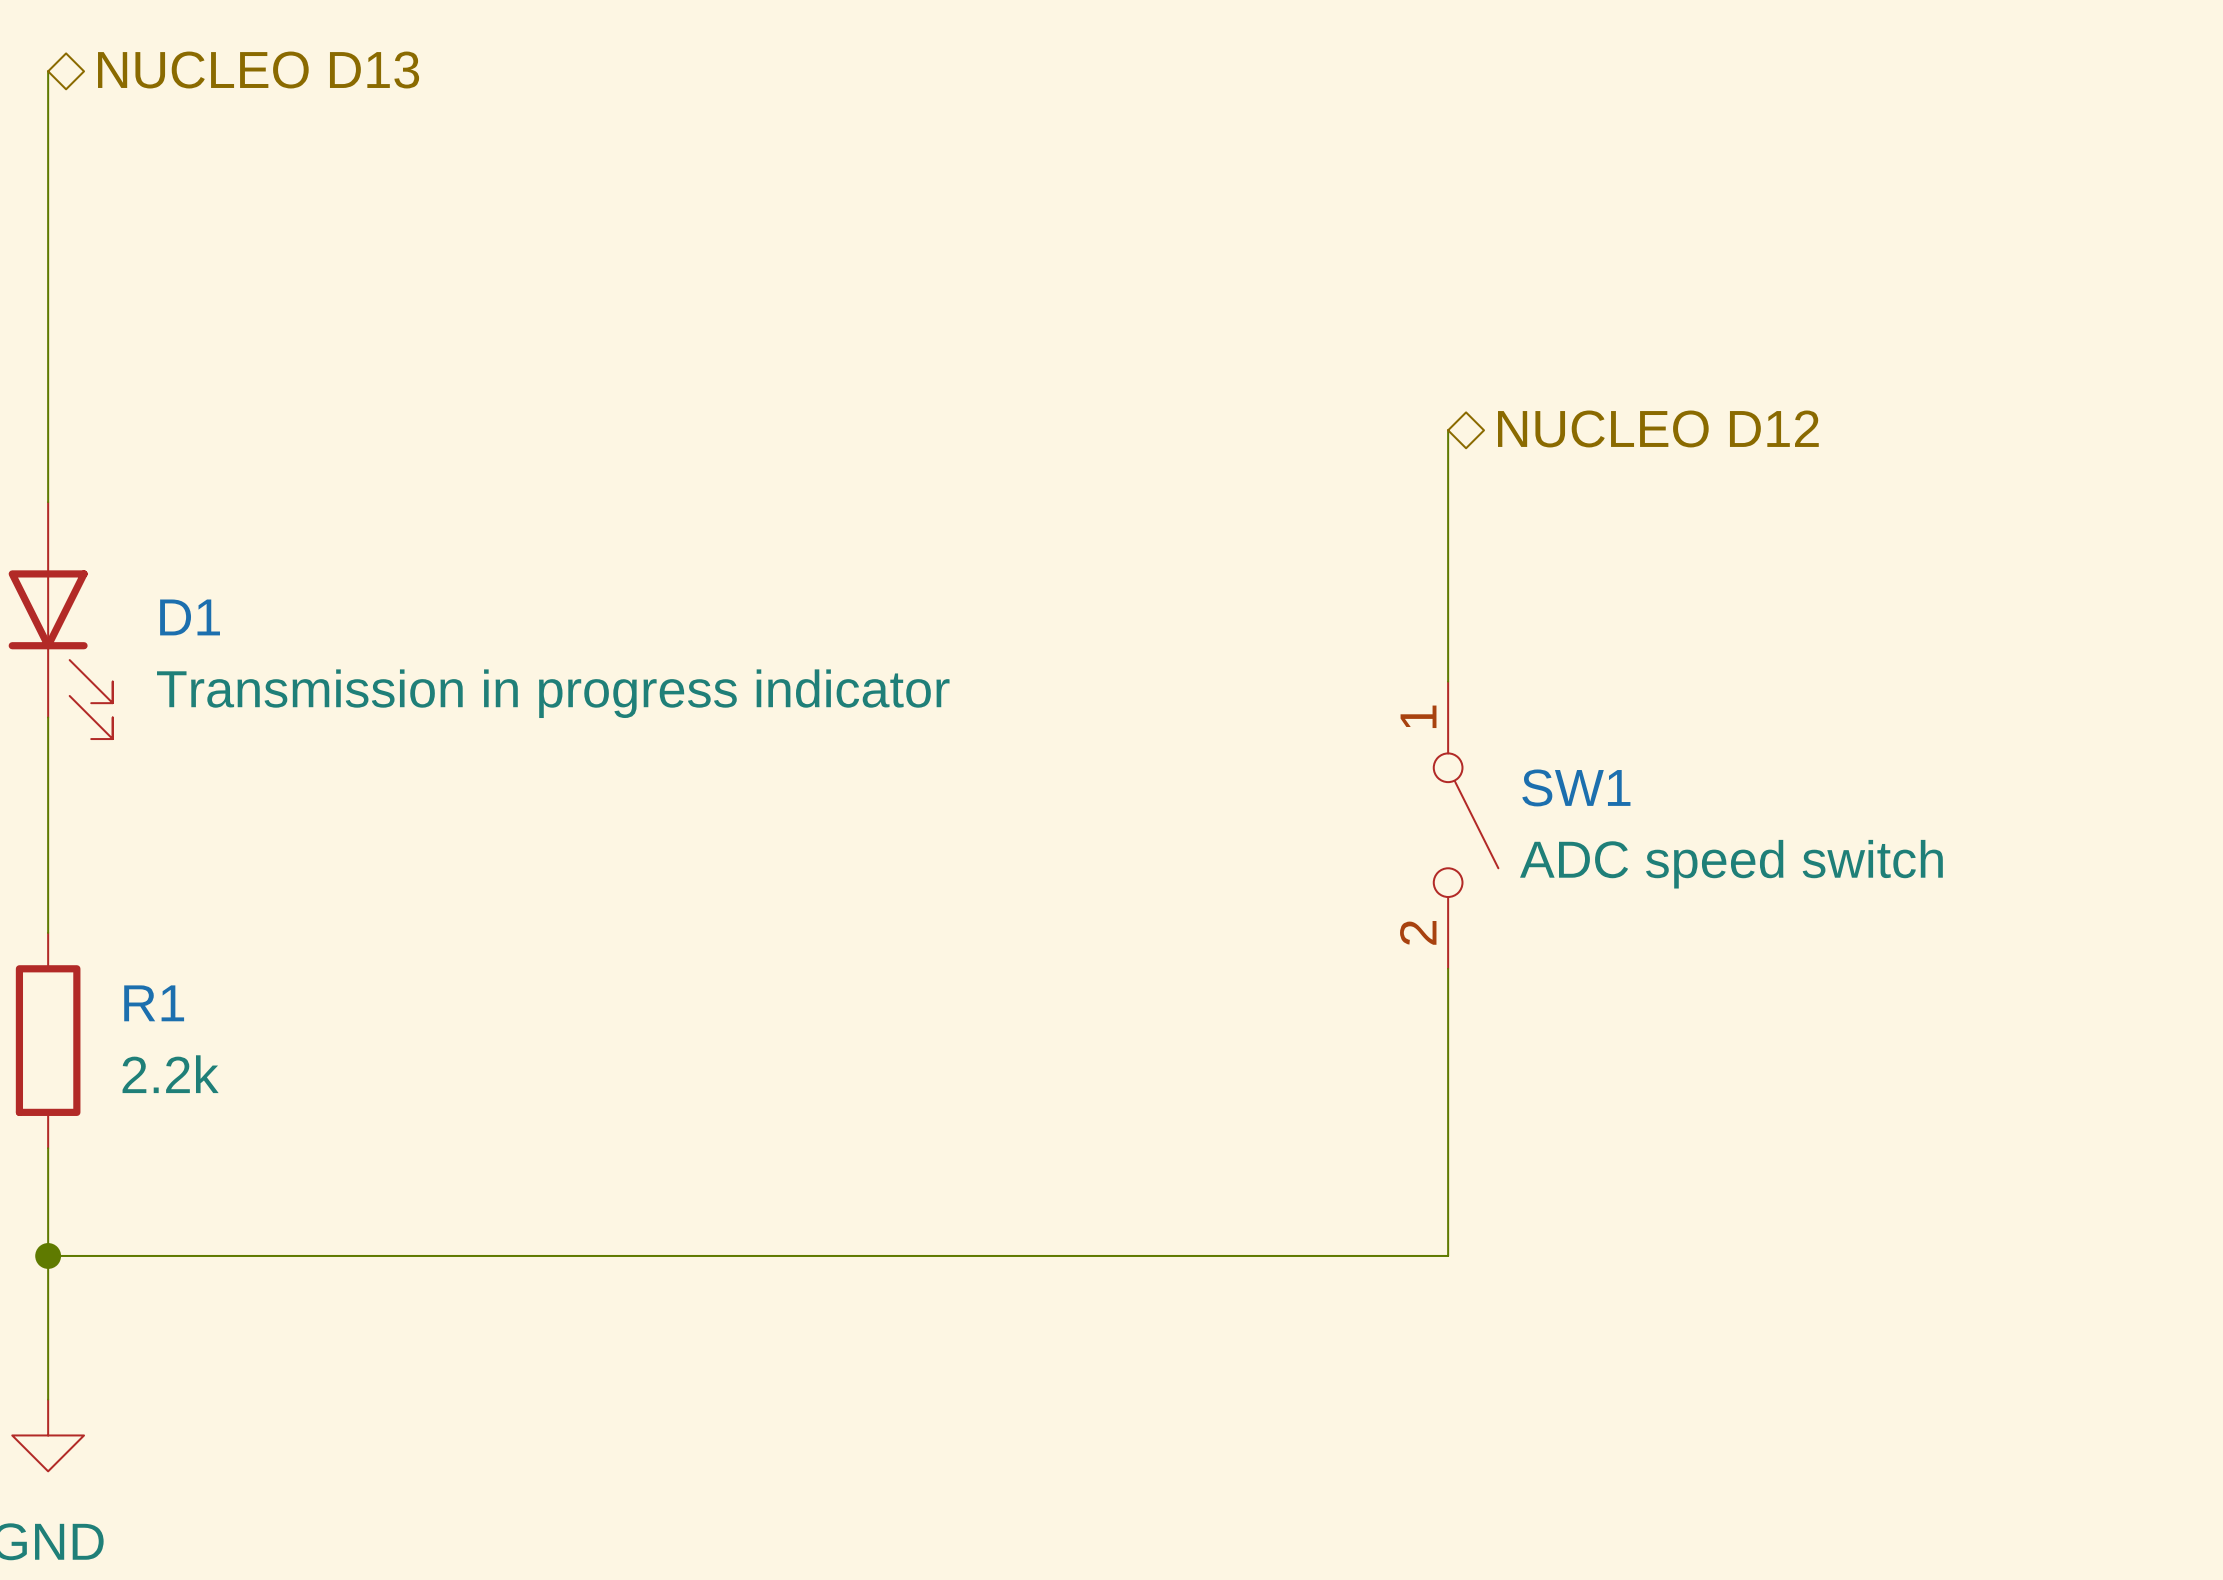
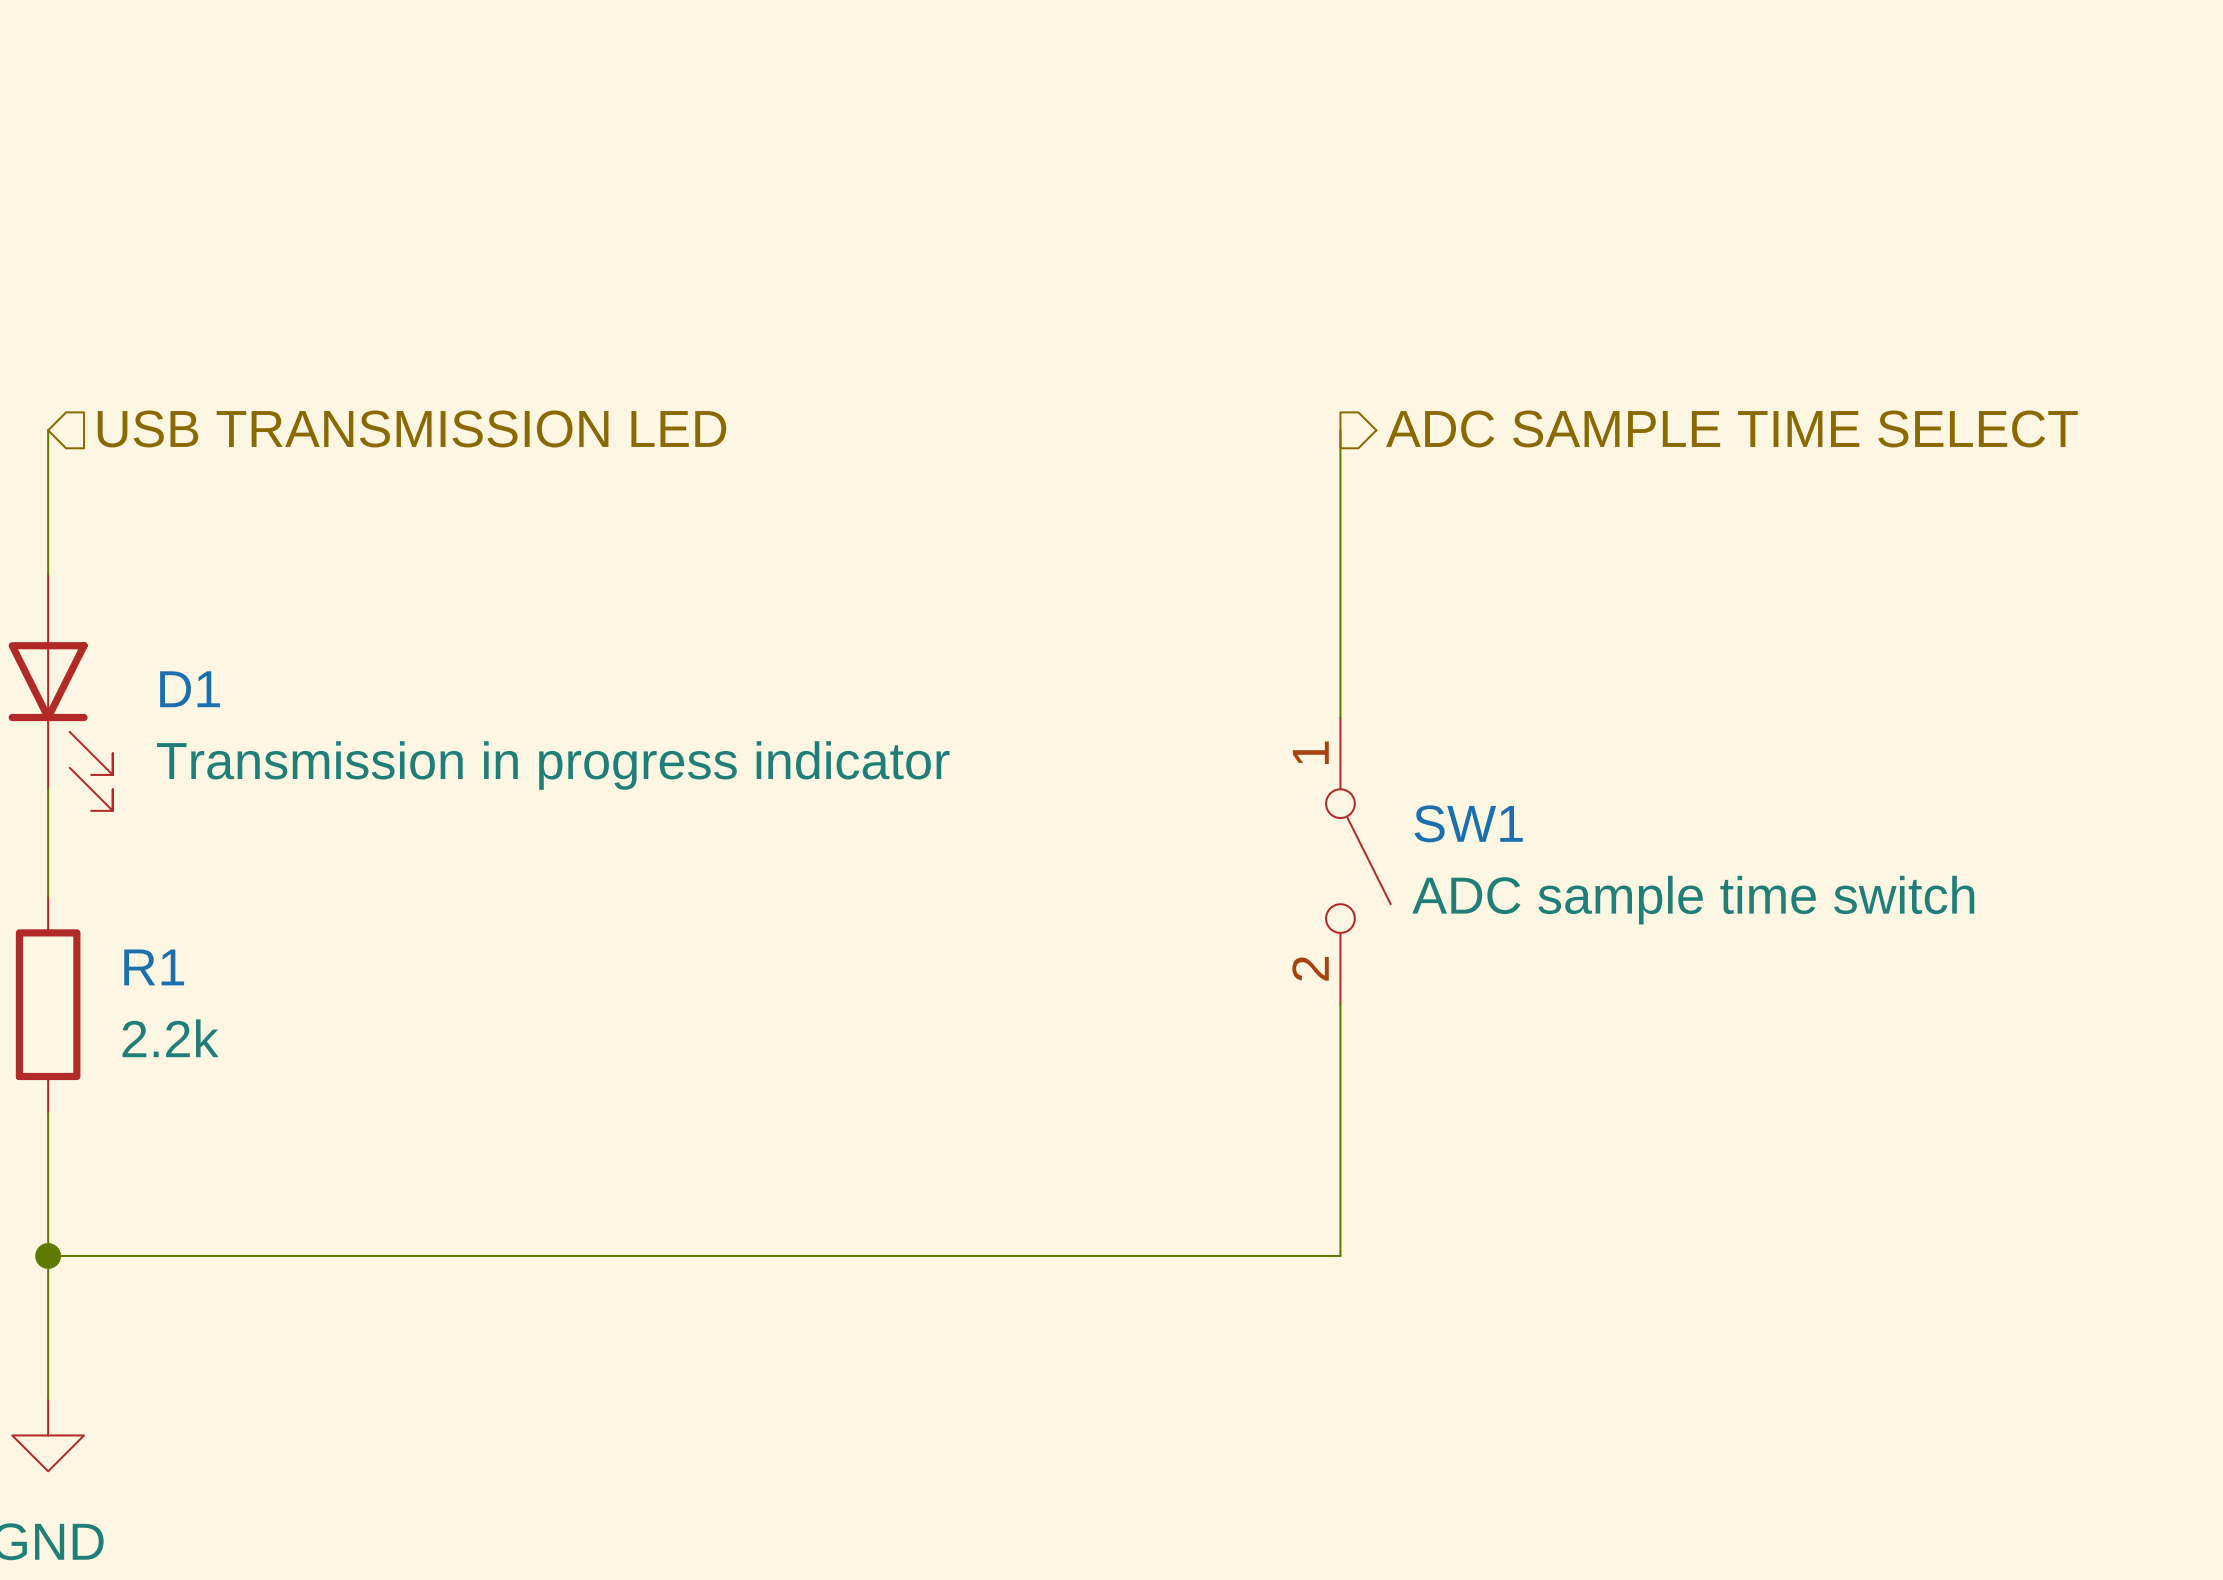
hierarchical label: NUCLEO D13 (258, 70) -> none
wire: (48, 71) (48, 430) -> none
hierarchical label: none -> USB TRANSMISSION LED (411, 428)
hierarchical label: NUCLEO D12 (1658, 428) -> none
hierarchical label: none -> ADC SAMPLE TIME SELECT (1731, 428)
wire: none -> (1340, 430) (1340, 717)
wire: (1448, 430) (1448, 681) -> none
D1 position: (60, 620) -> (60, 692)
SW1 position: (1466, 825) -> (1358, 861)
SW1 value: ADC speed switch (1731, 864) -> ADC sample time switch (1693, 900)
wire: (1448, 968) (1448, 1255) (1340, 1255) -> (1340, 1004) (1340, 1255)
R1 position: (48, 1040) -> (48, 1004)

